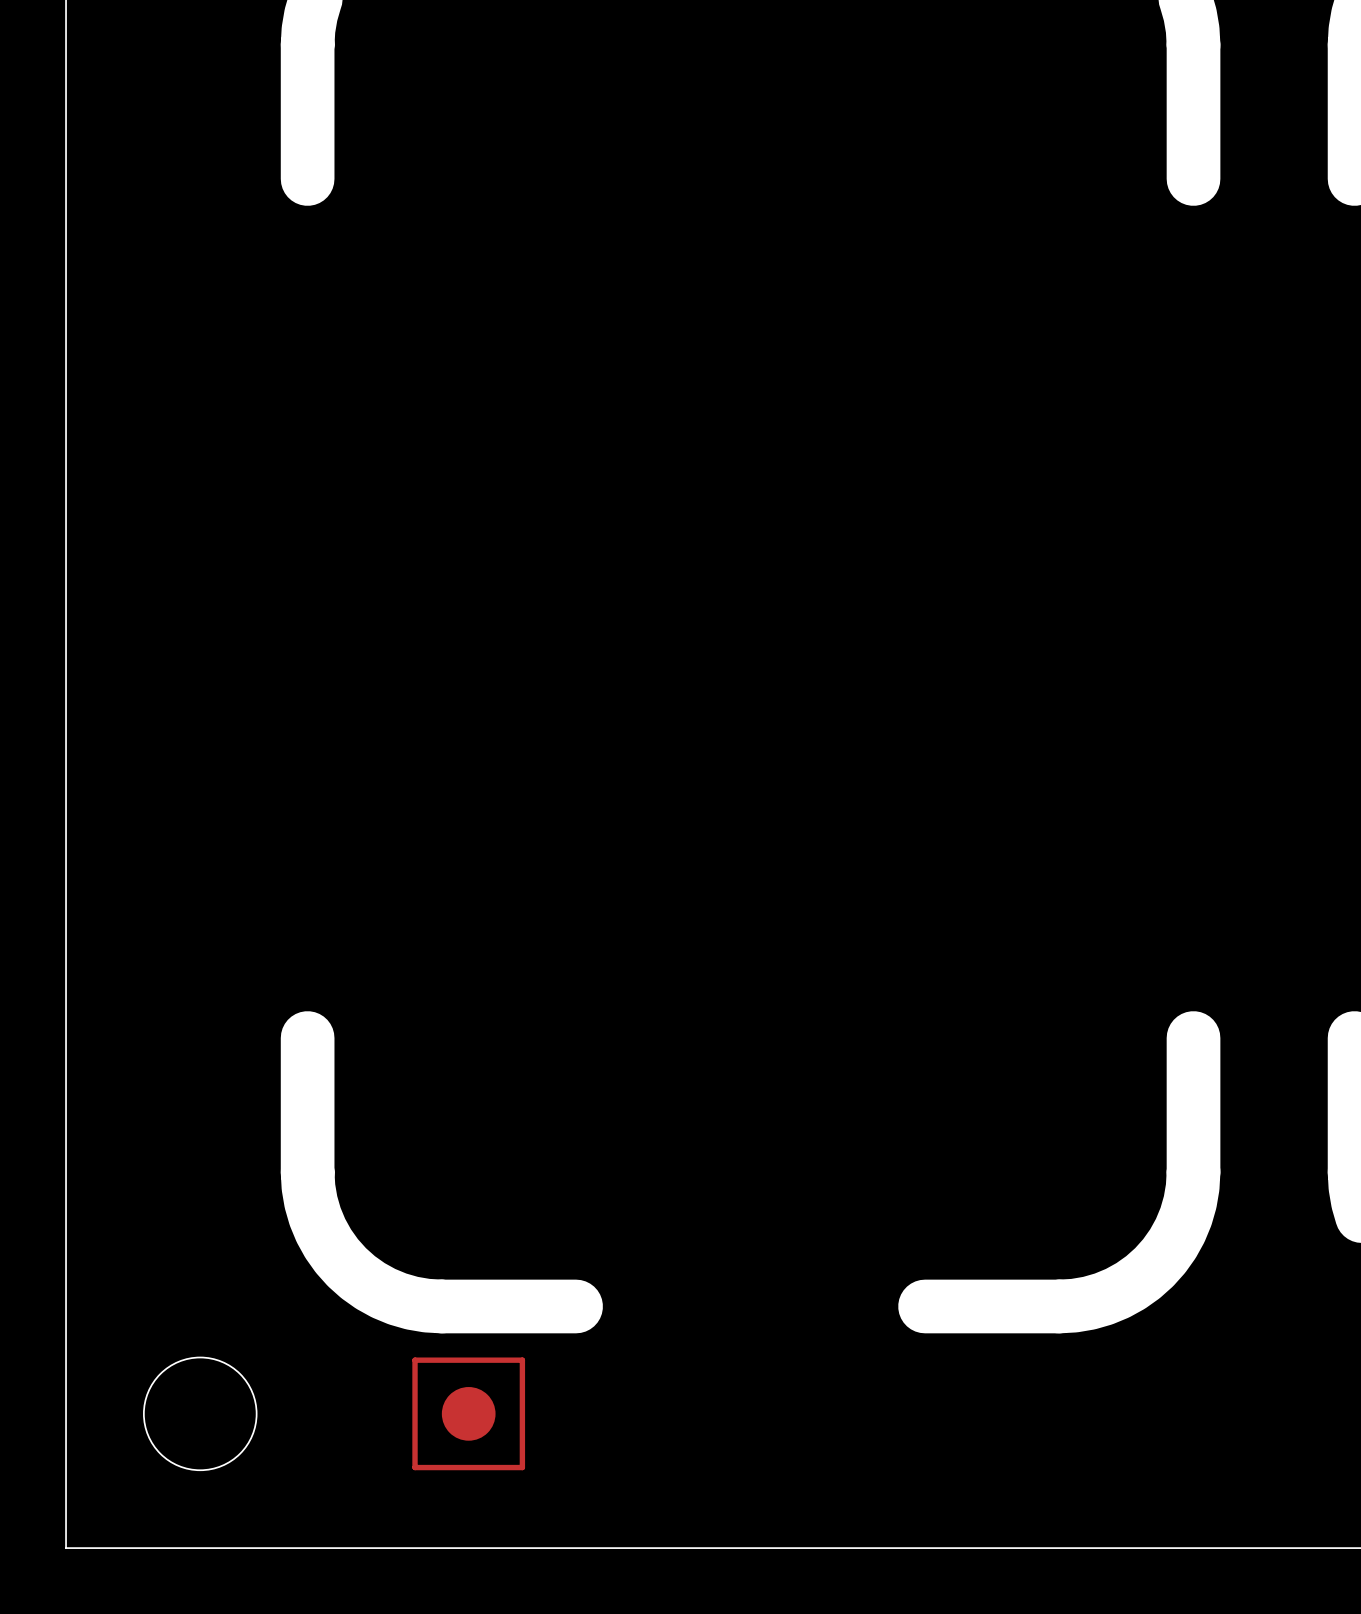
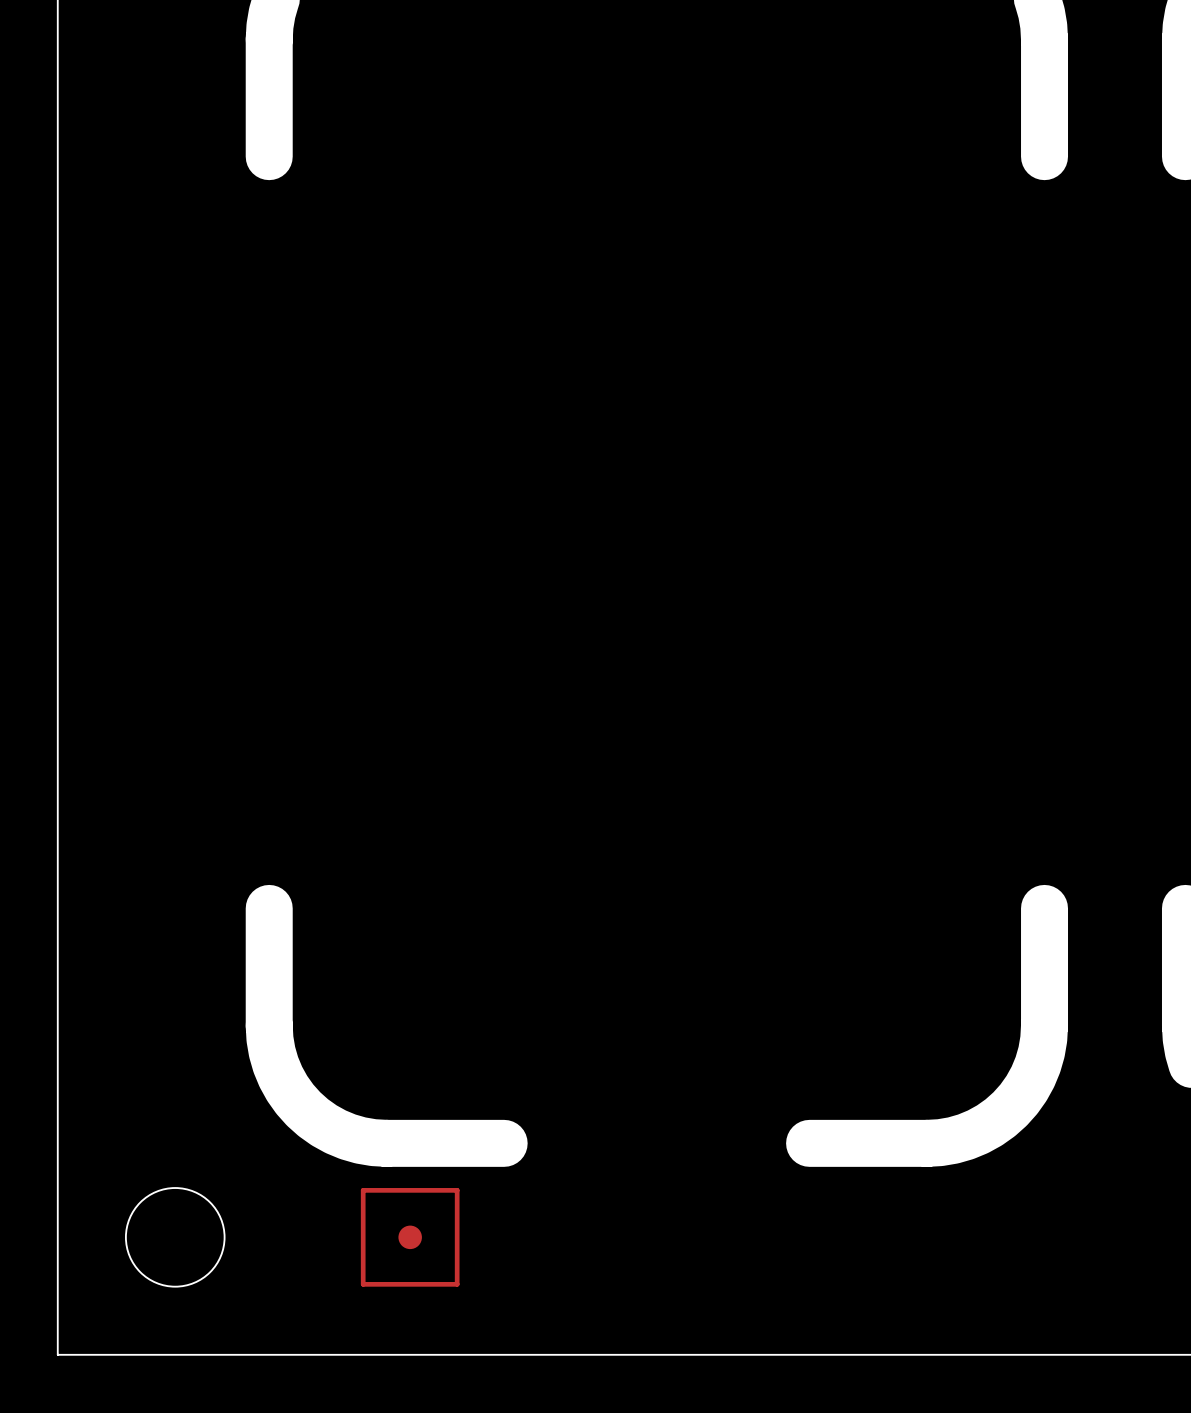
part footprint: [412, 1357, 526, 1471] -> [360, 1188, 460, 1287]

